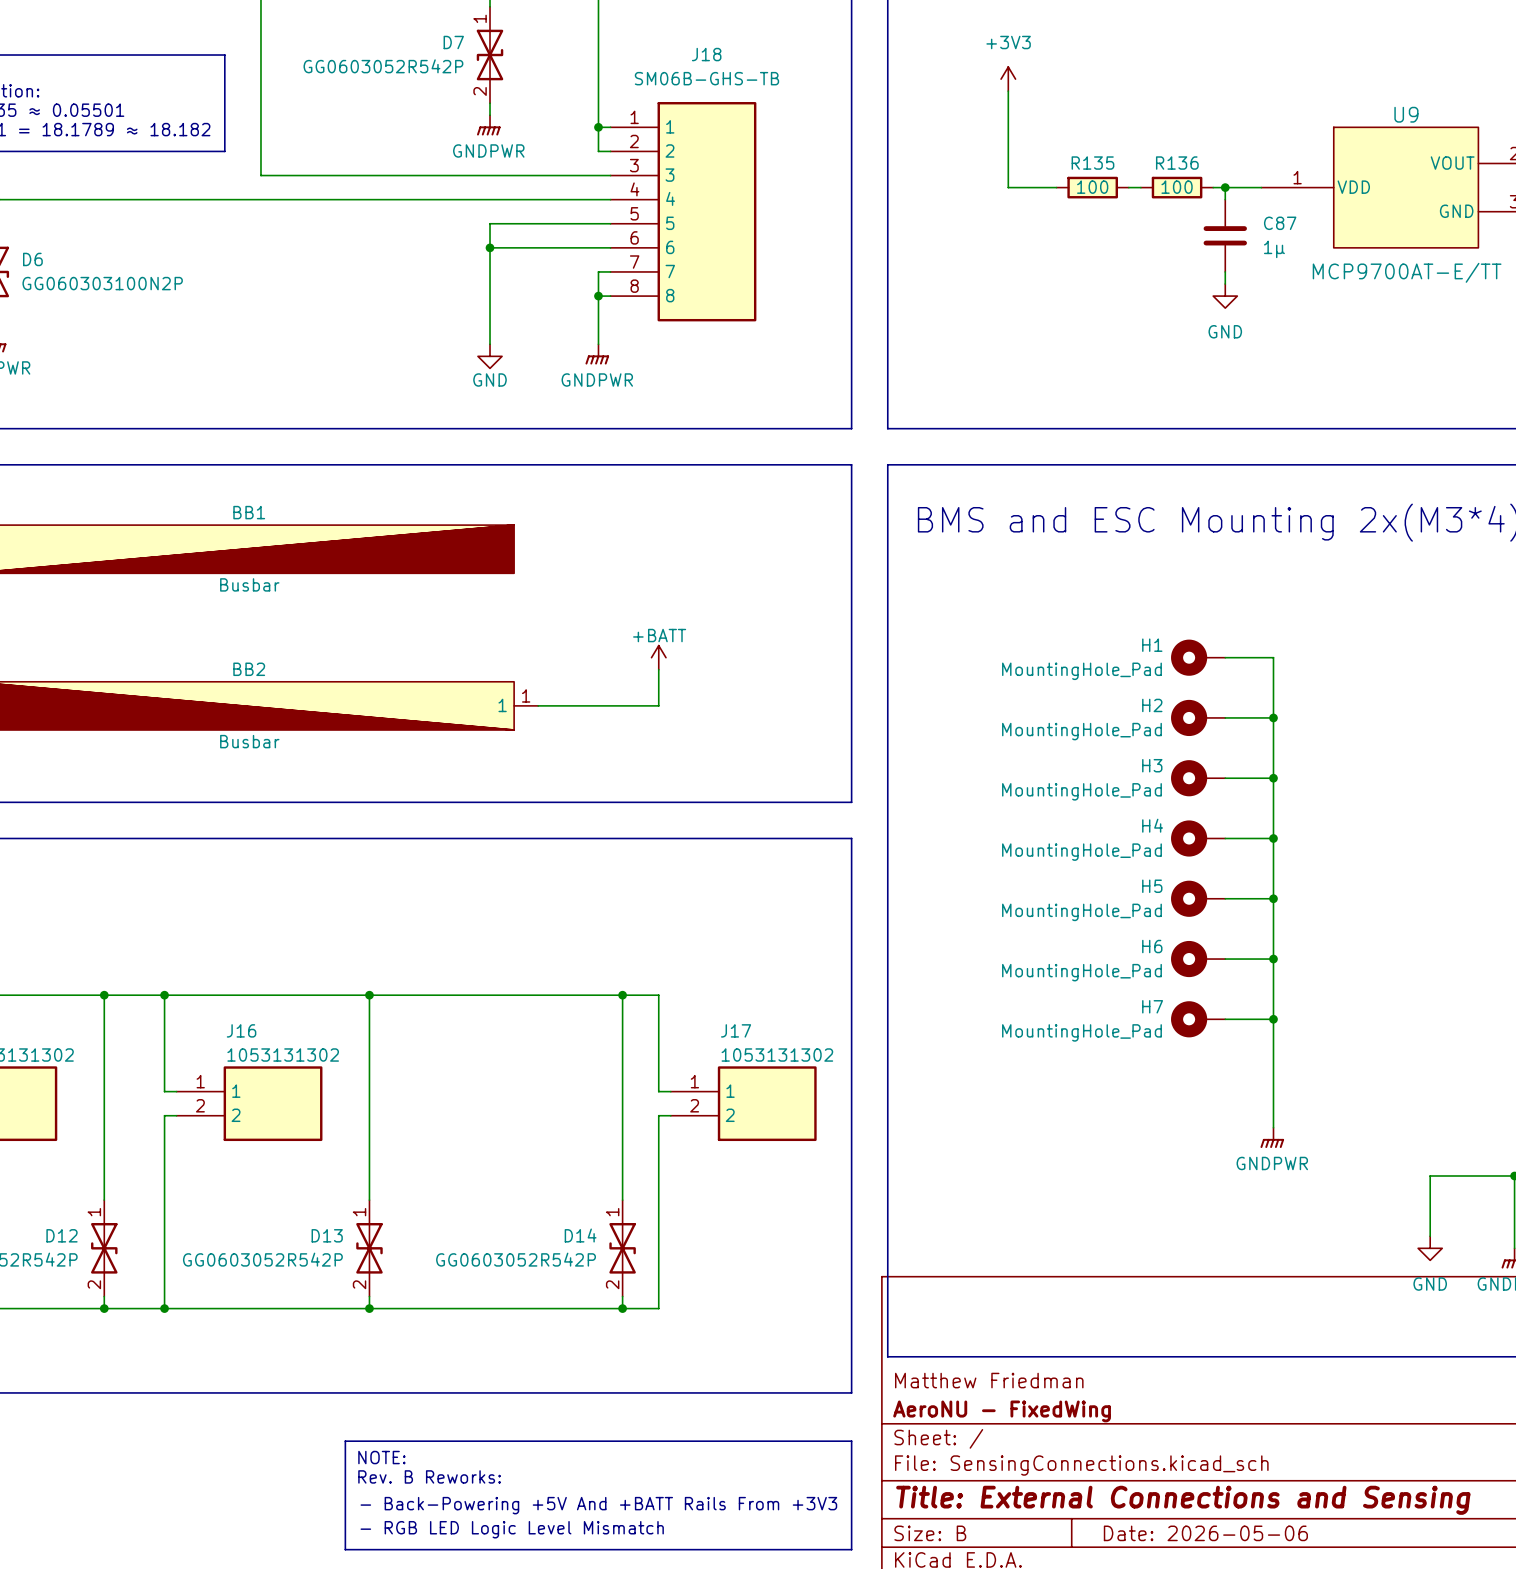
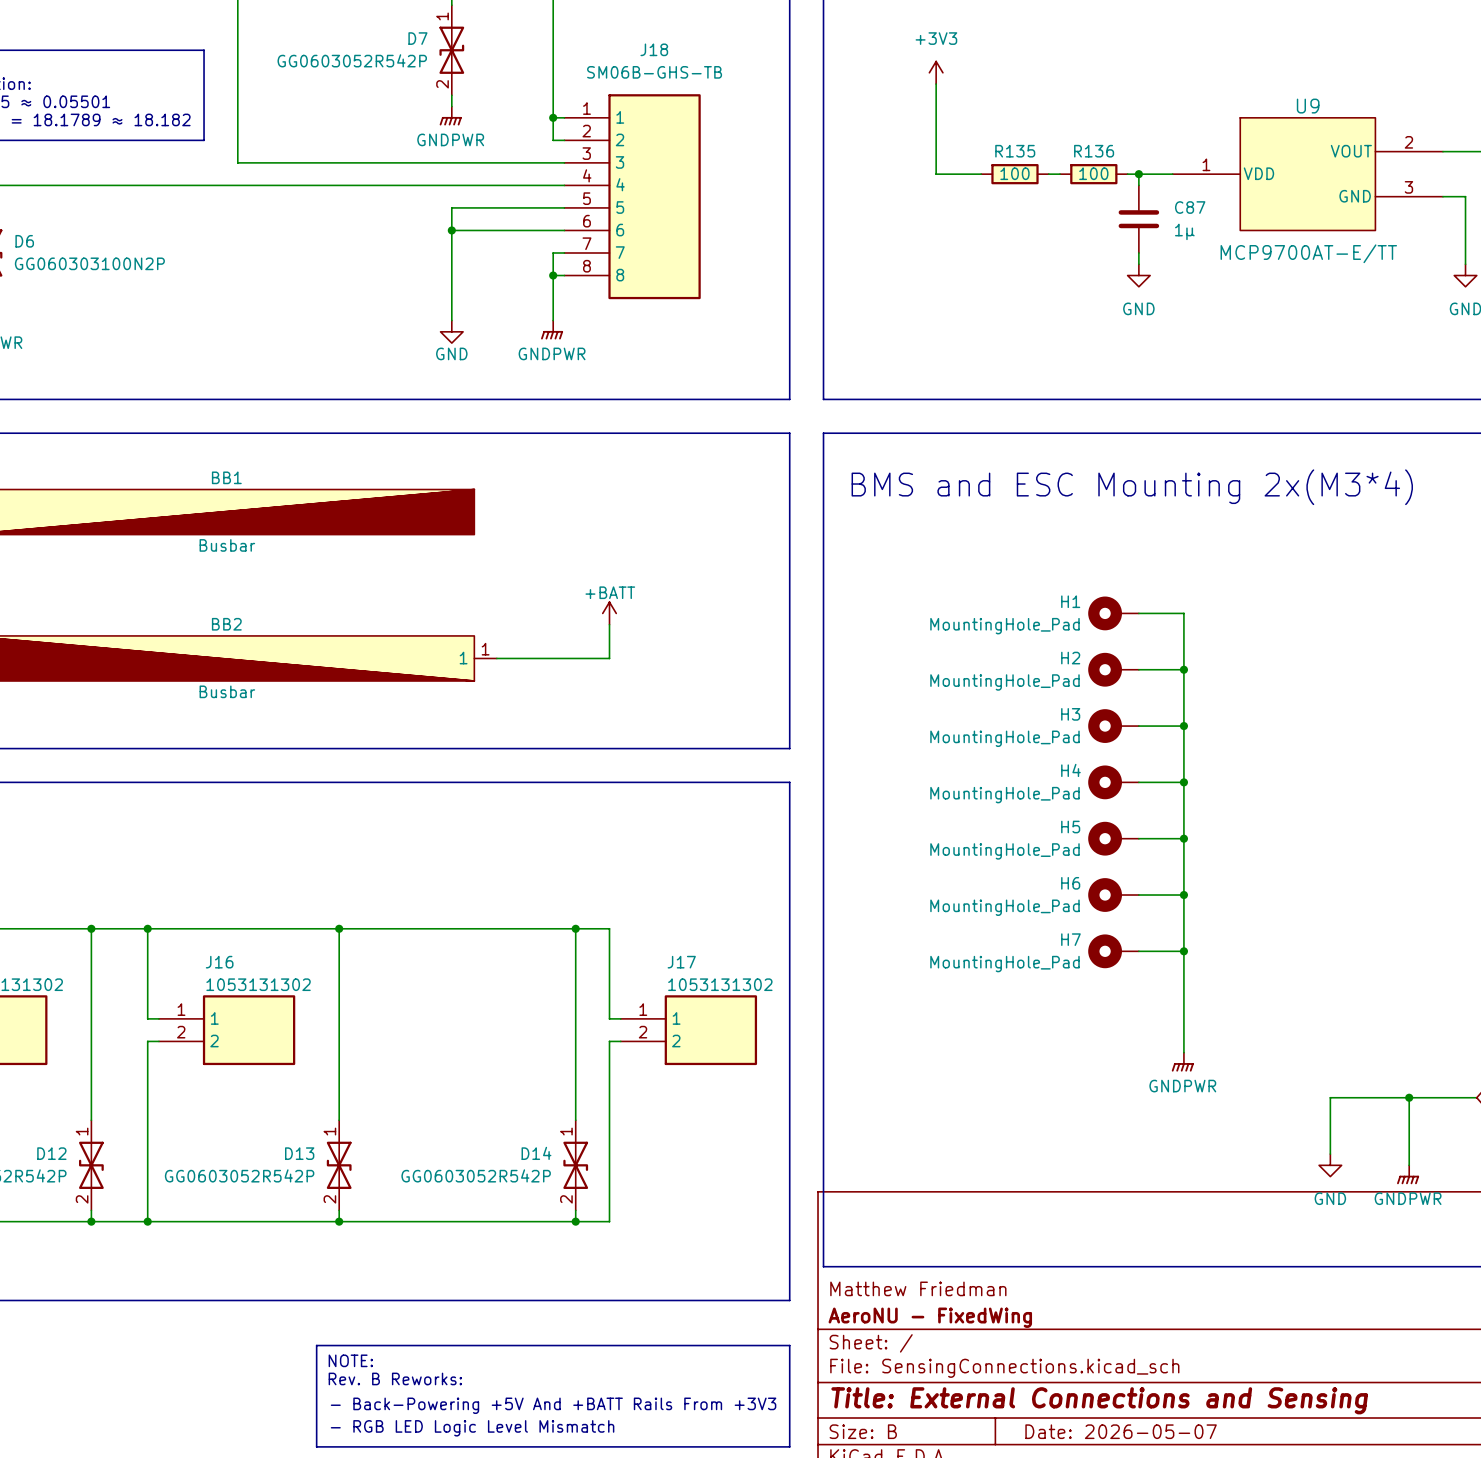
title block: Date: 2026-05-06 (1205, 1533) -> Date: 2026-05-07 (1121, 1431)

